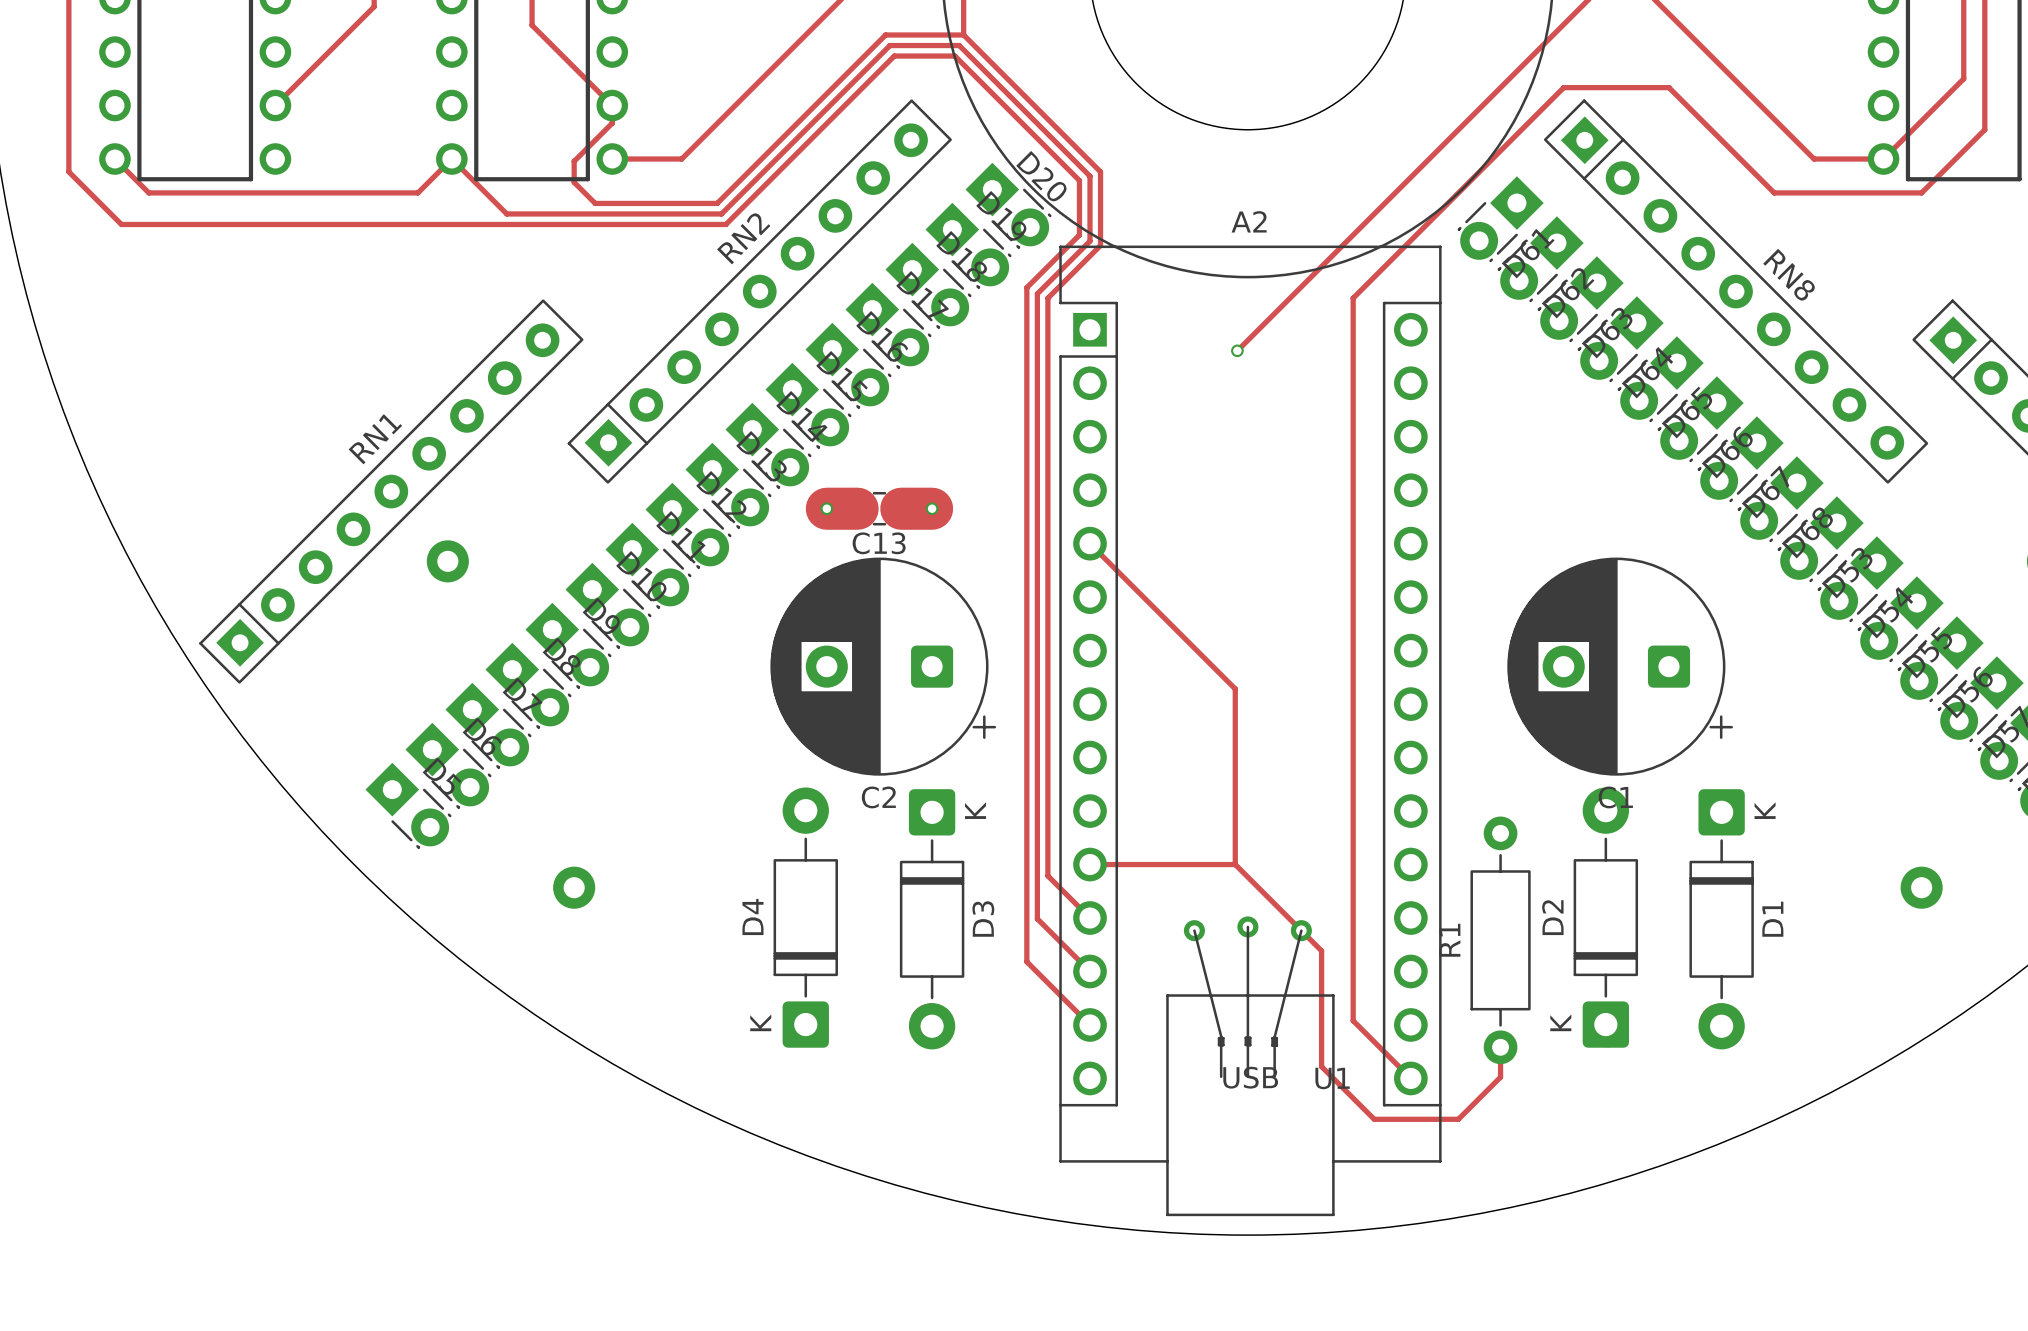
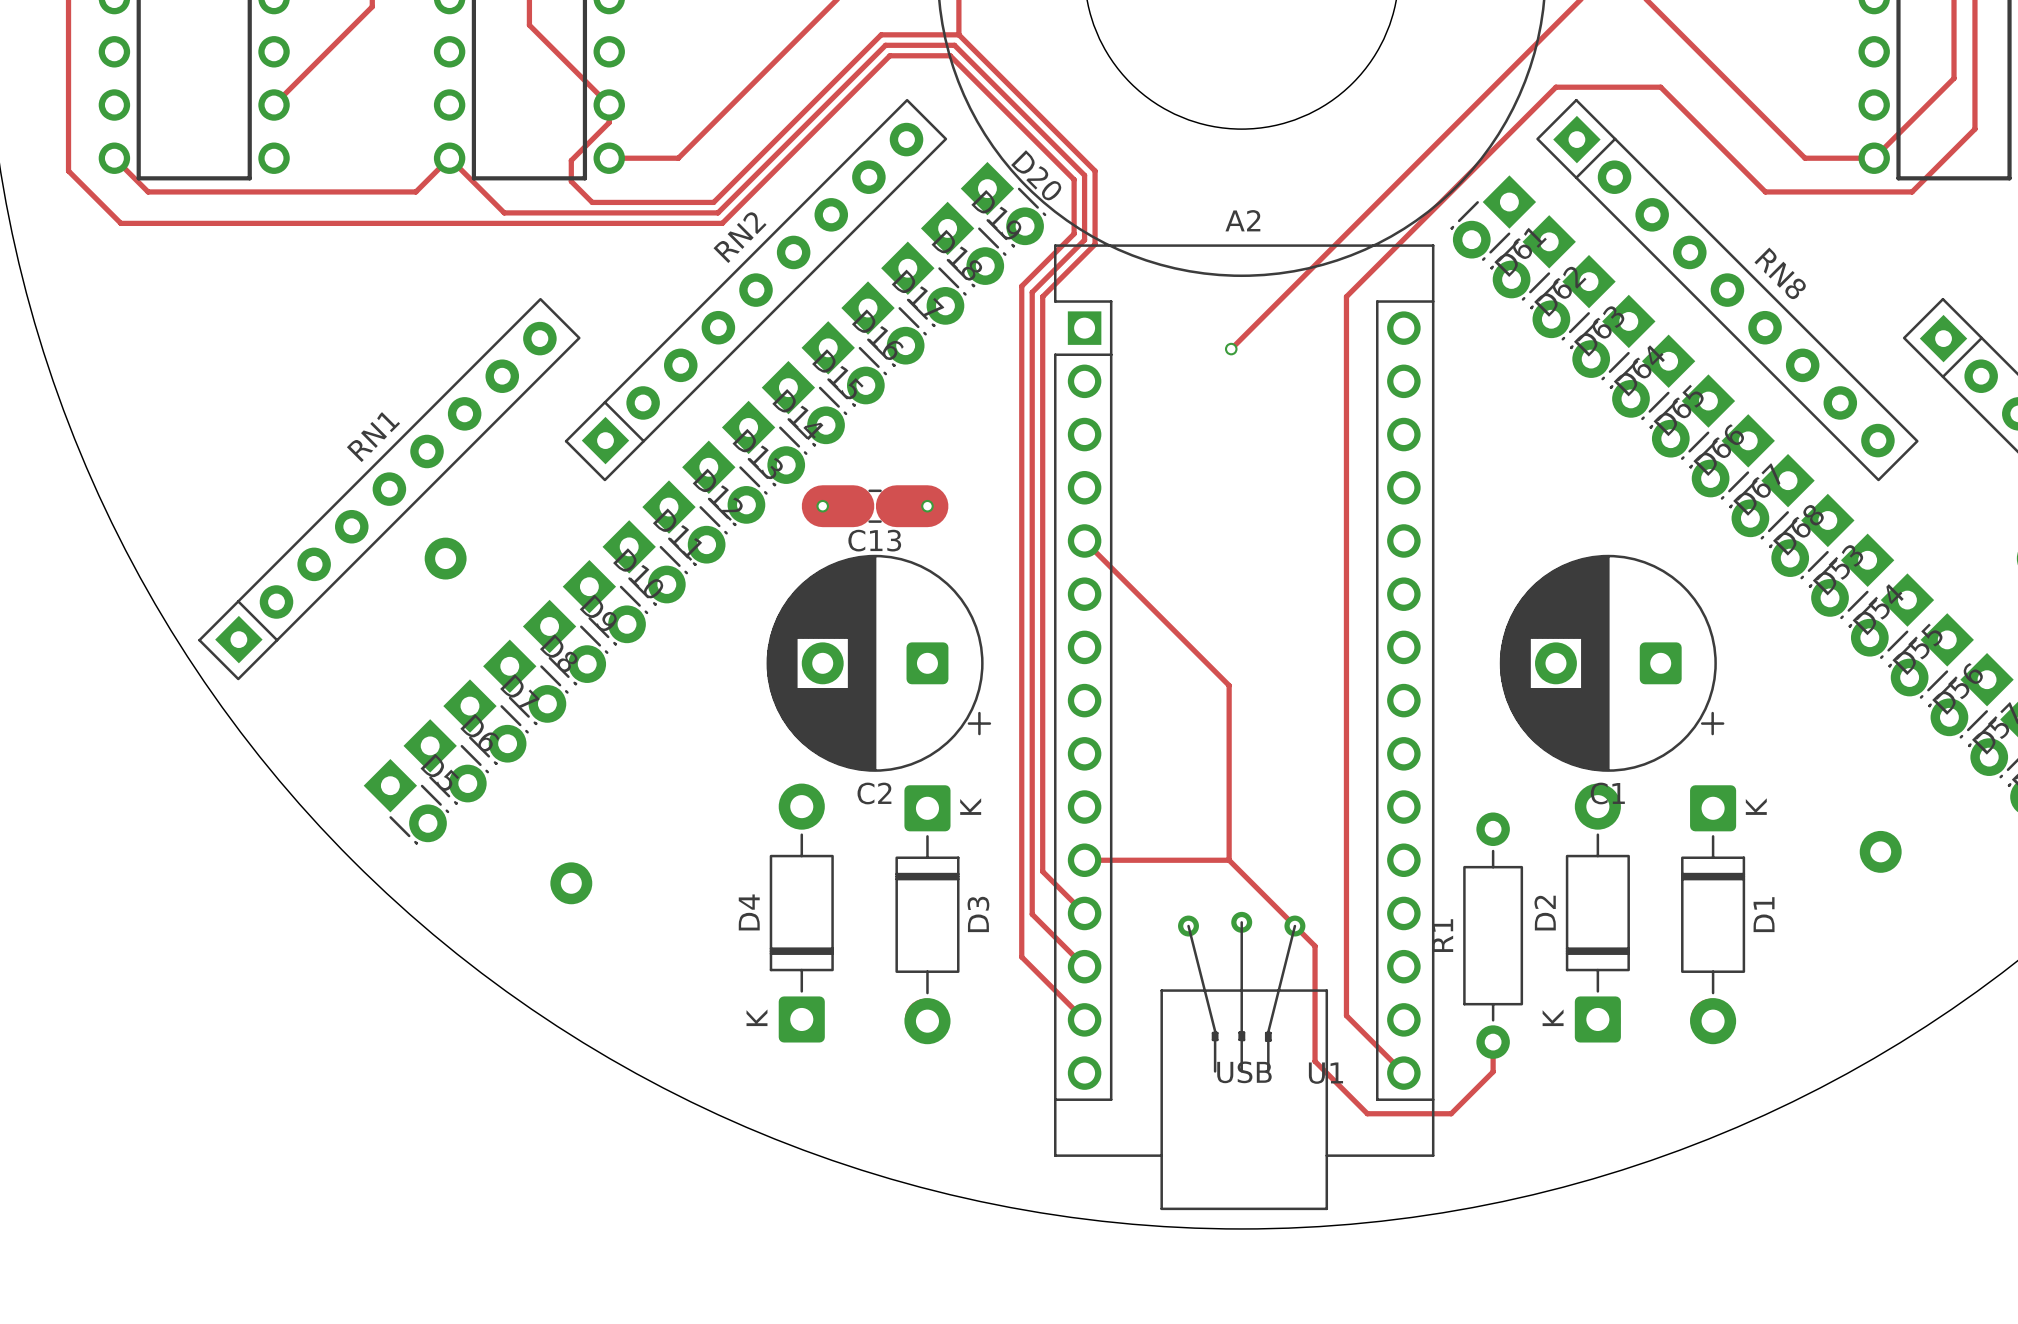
part position: (1921, 887) -> (1880, 851)

